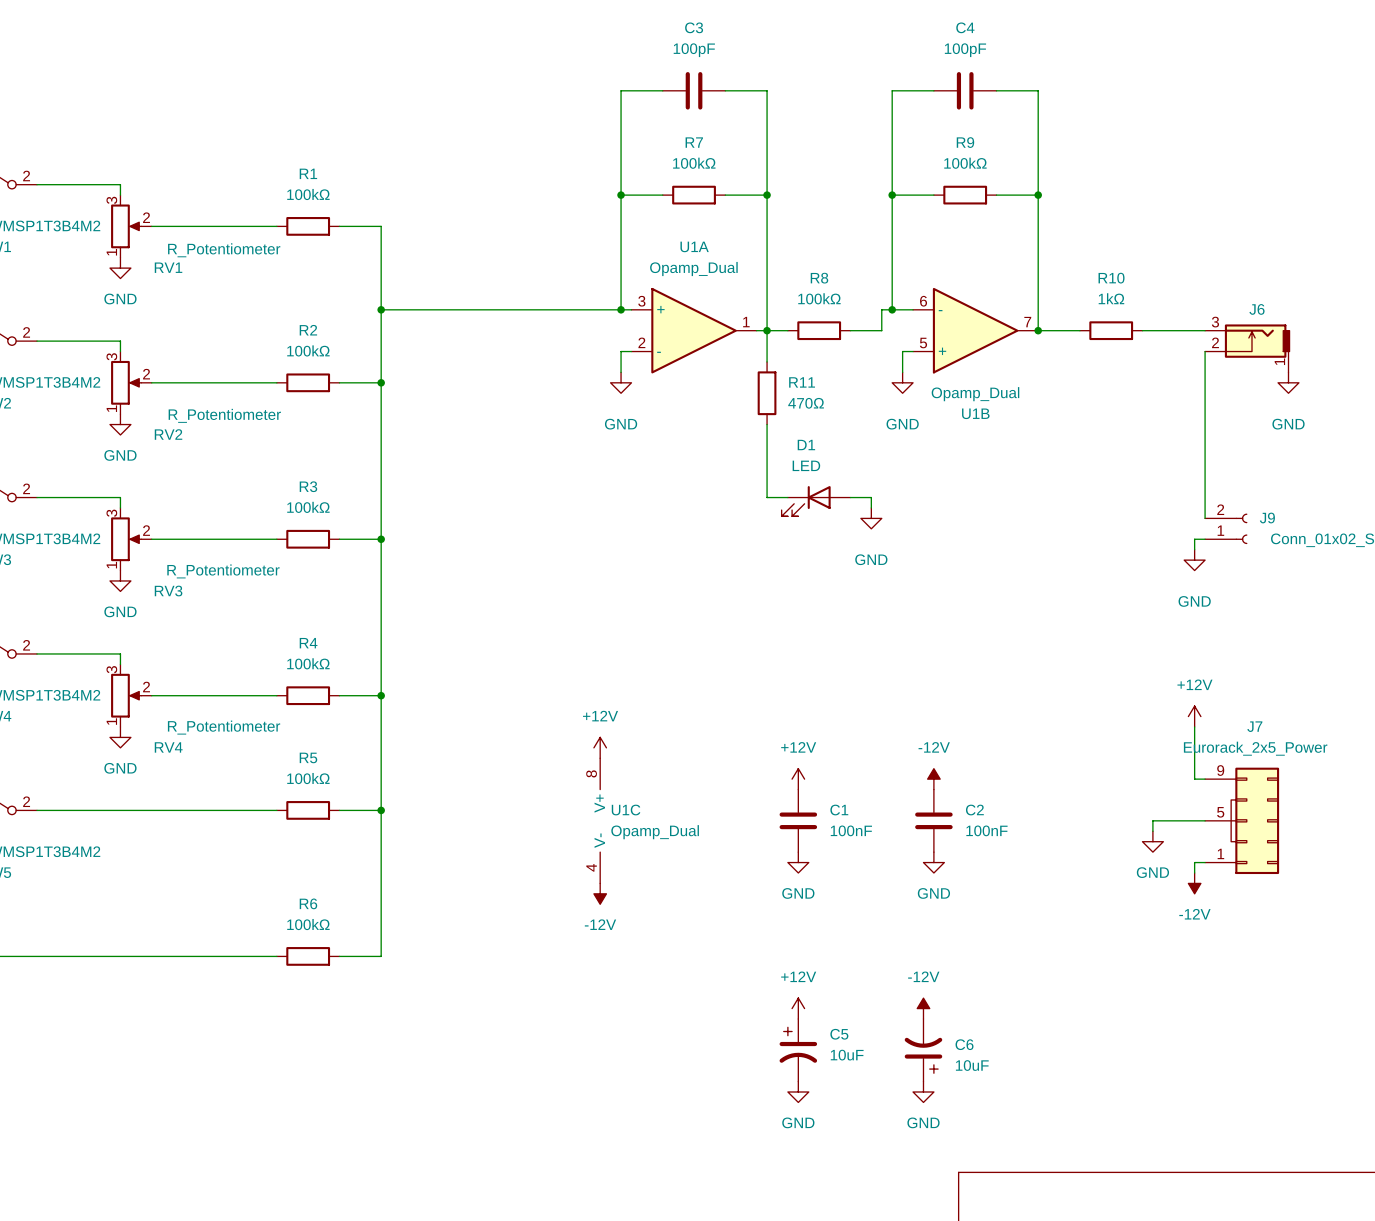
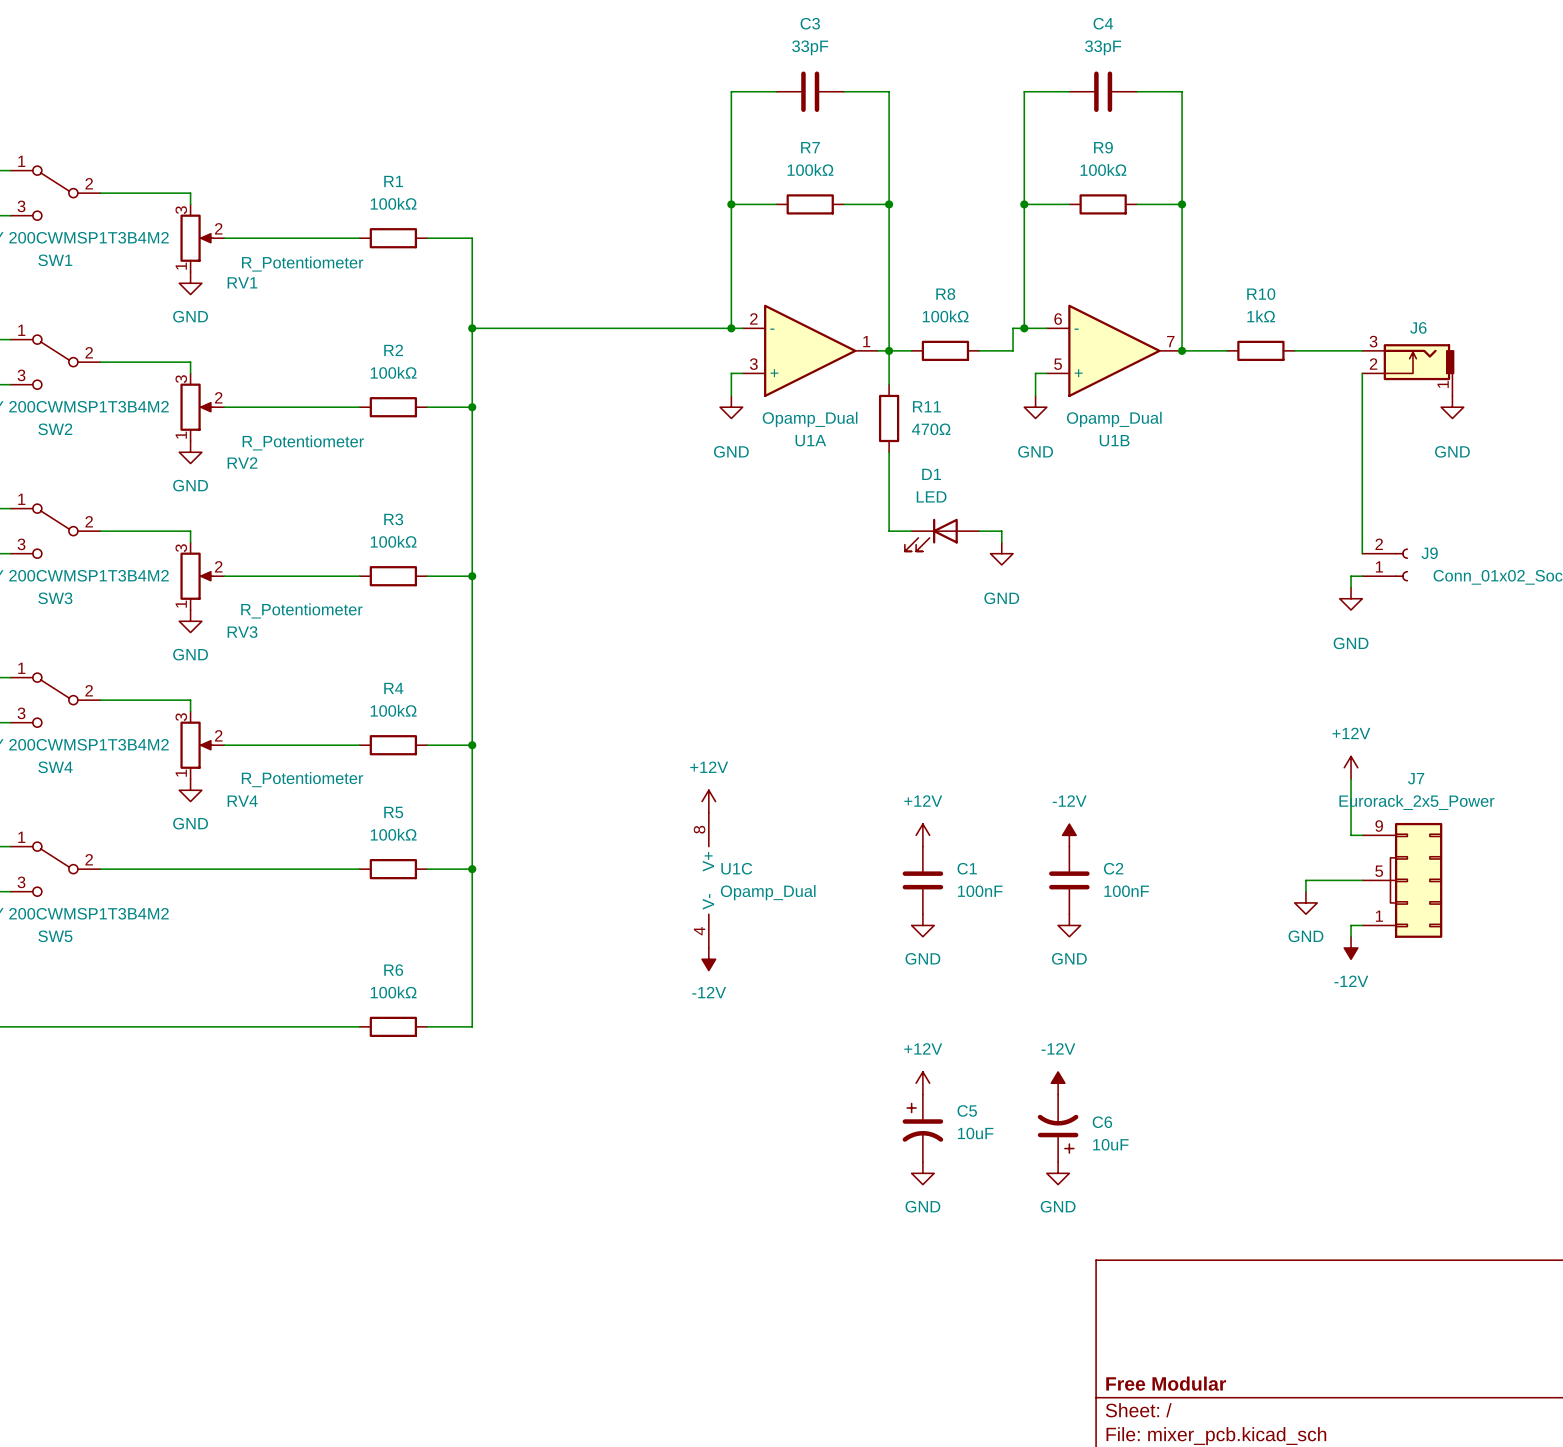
C3 value: 100pF (694, 50) -> 33pF (810, 47)
C4 value: 100pF (965, 50) -> 33pF (1103, 47)
U1A flip: as is (694, 330) -> up-down (810, 350)

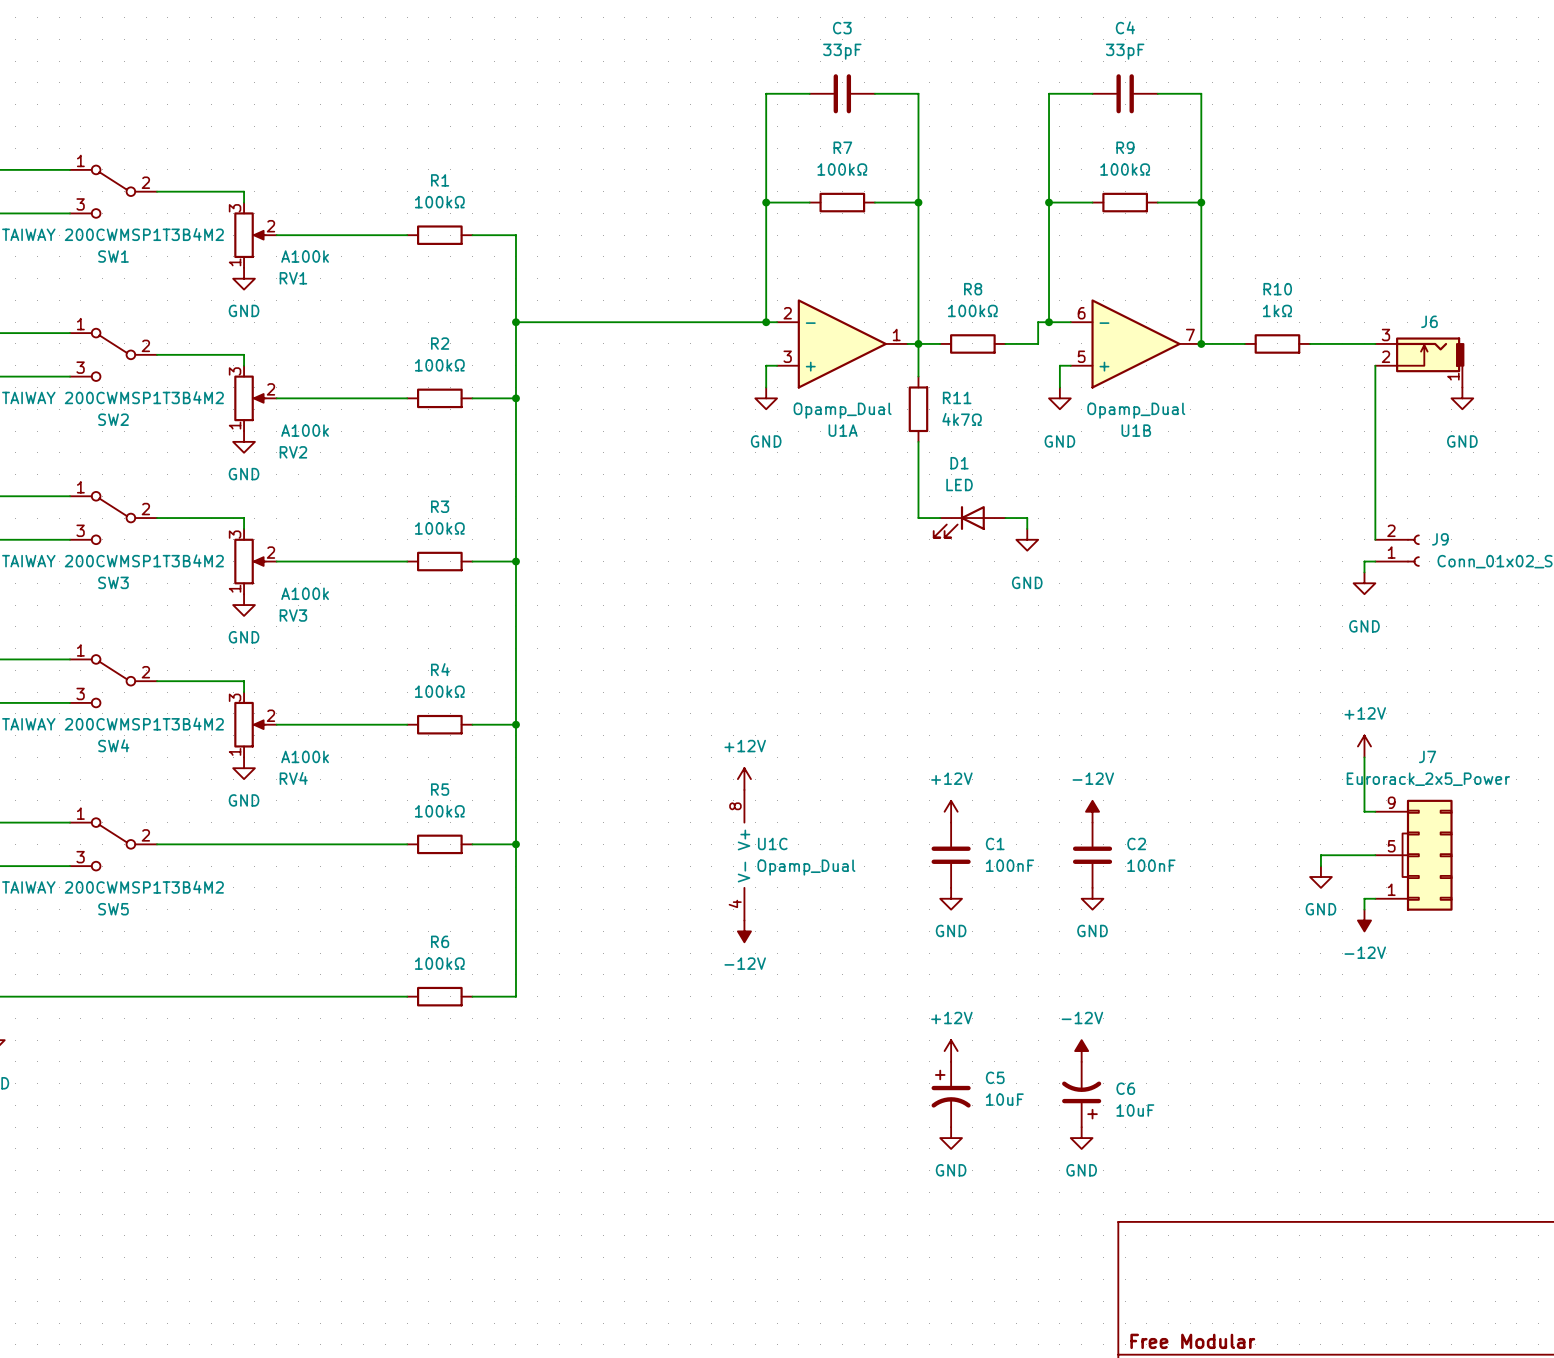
RV1 value: R_Potentiometer (302, 264) -> A100k (305, 256)
R11 value: 470Ω (931, 429) -> 4k7Ω (962, 419)
RV2 value: R_Potentiometer (303, 442) -> A100k (305, 430)
RV3 value: R_Potentiometer (301, 610) -> A100k (305, 593)
RV4 value: R_Potentiometer (302, 779) -> A100k (305, 756)

